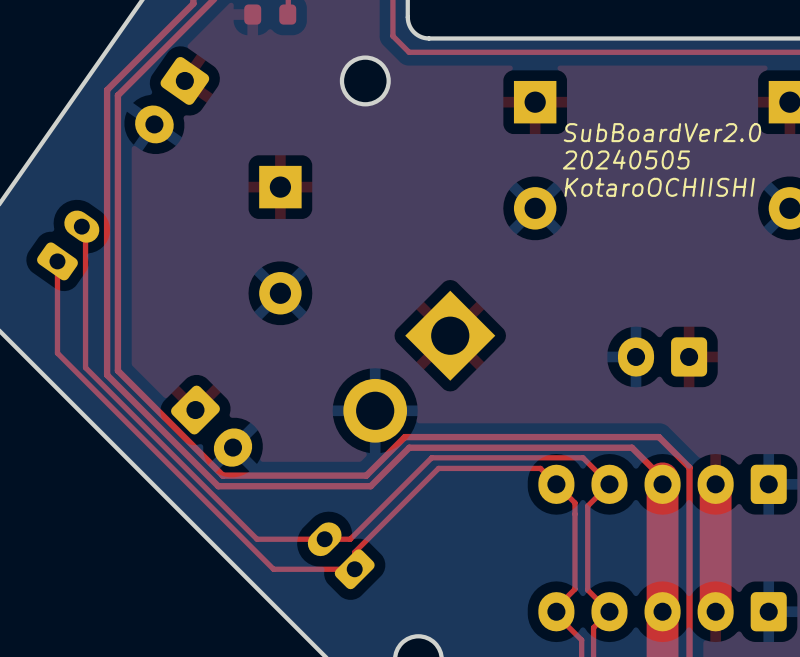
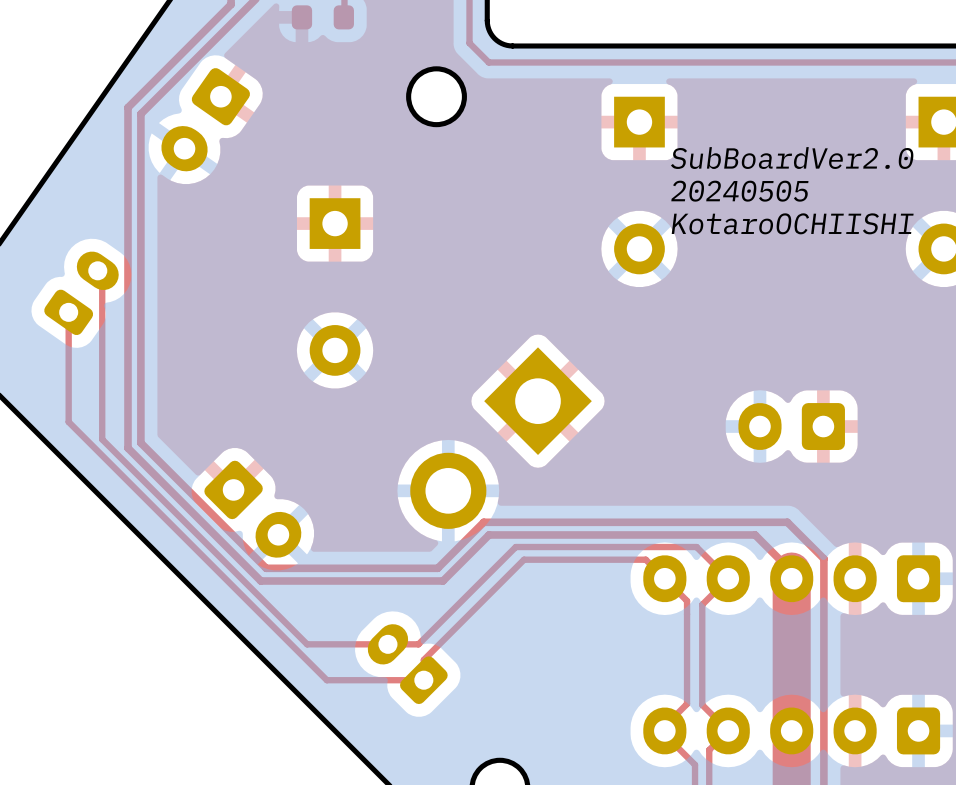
top track: (715, 484) (715, 611) -> none

